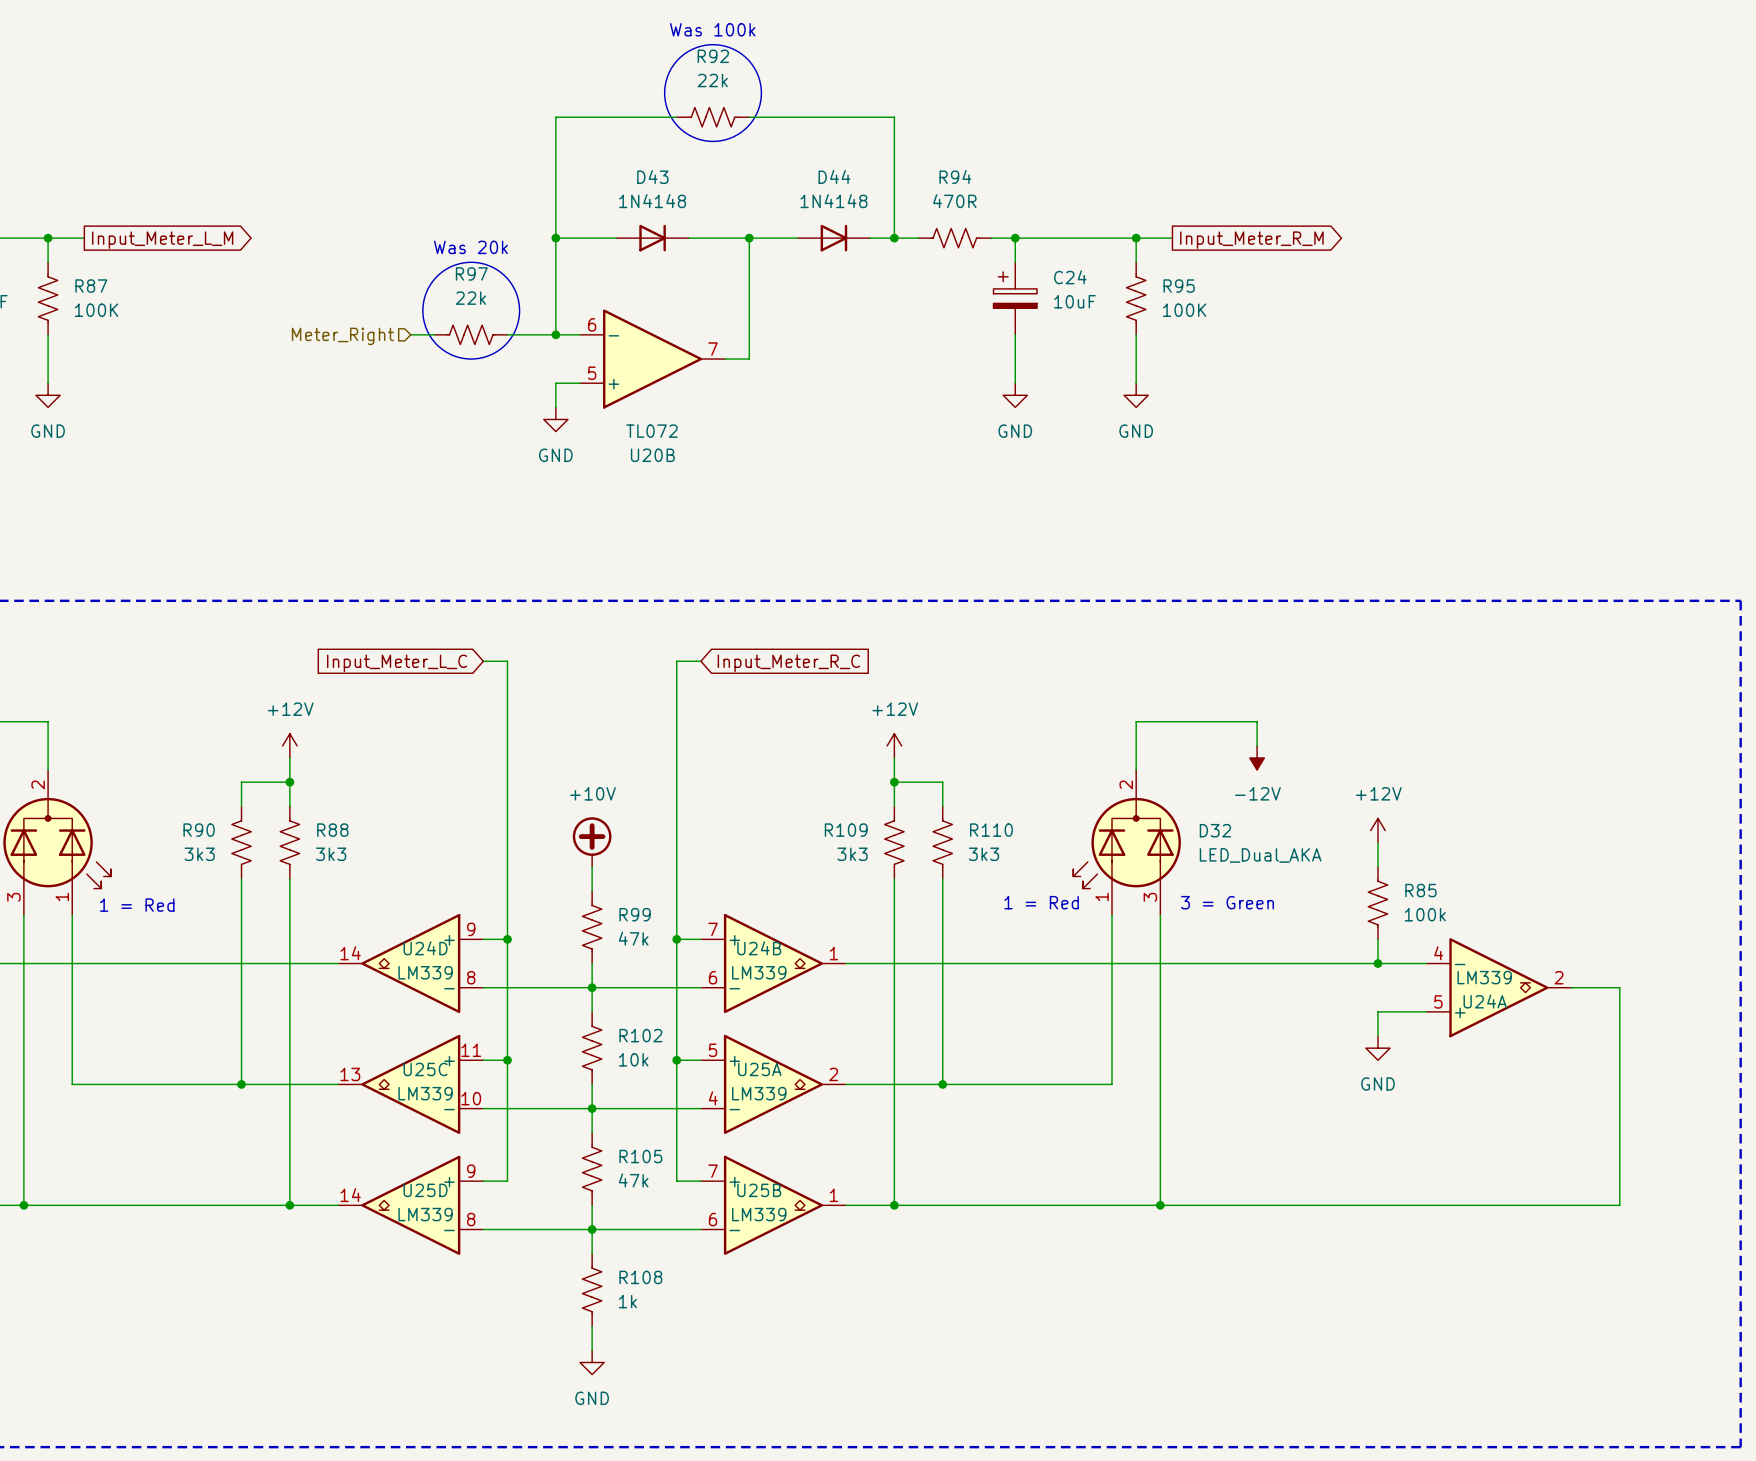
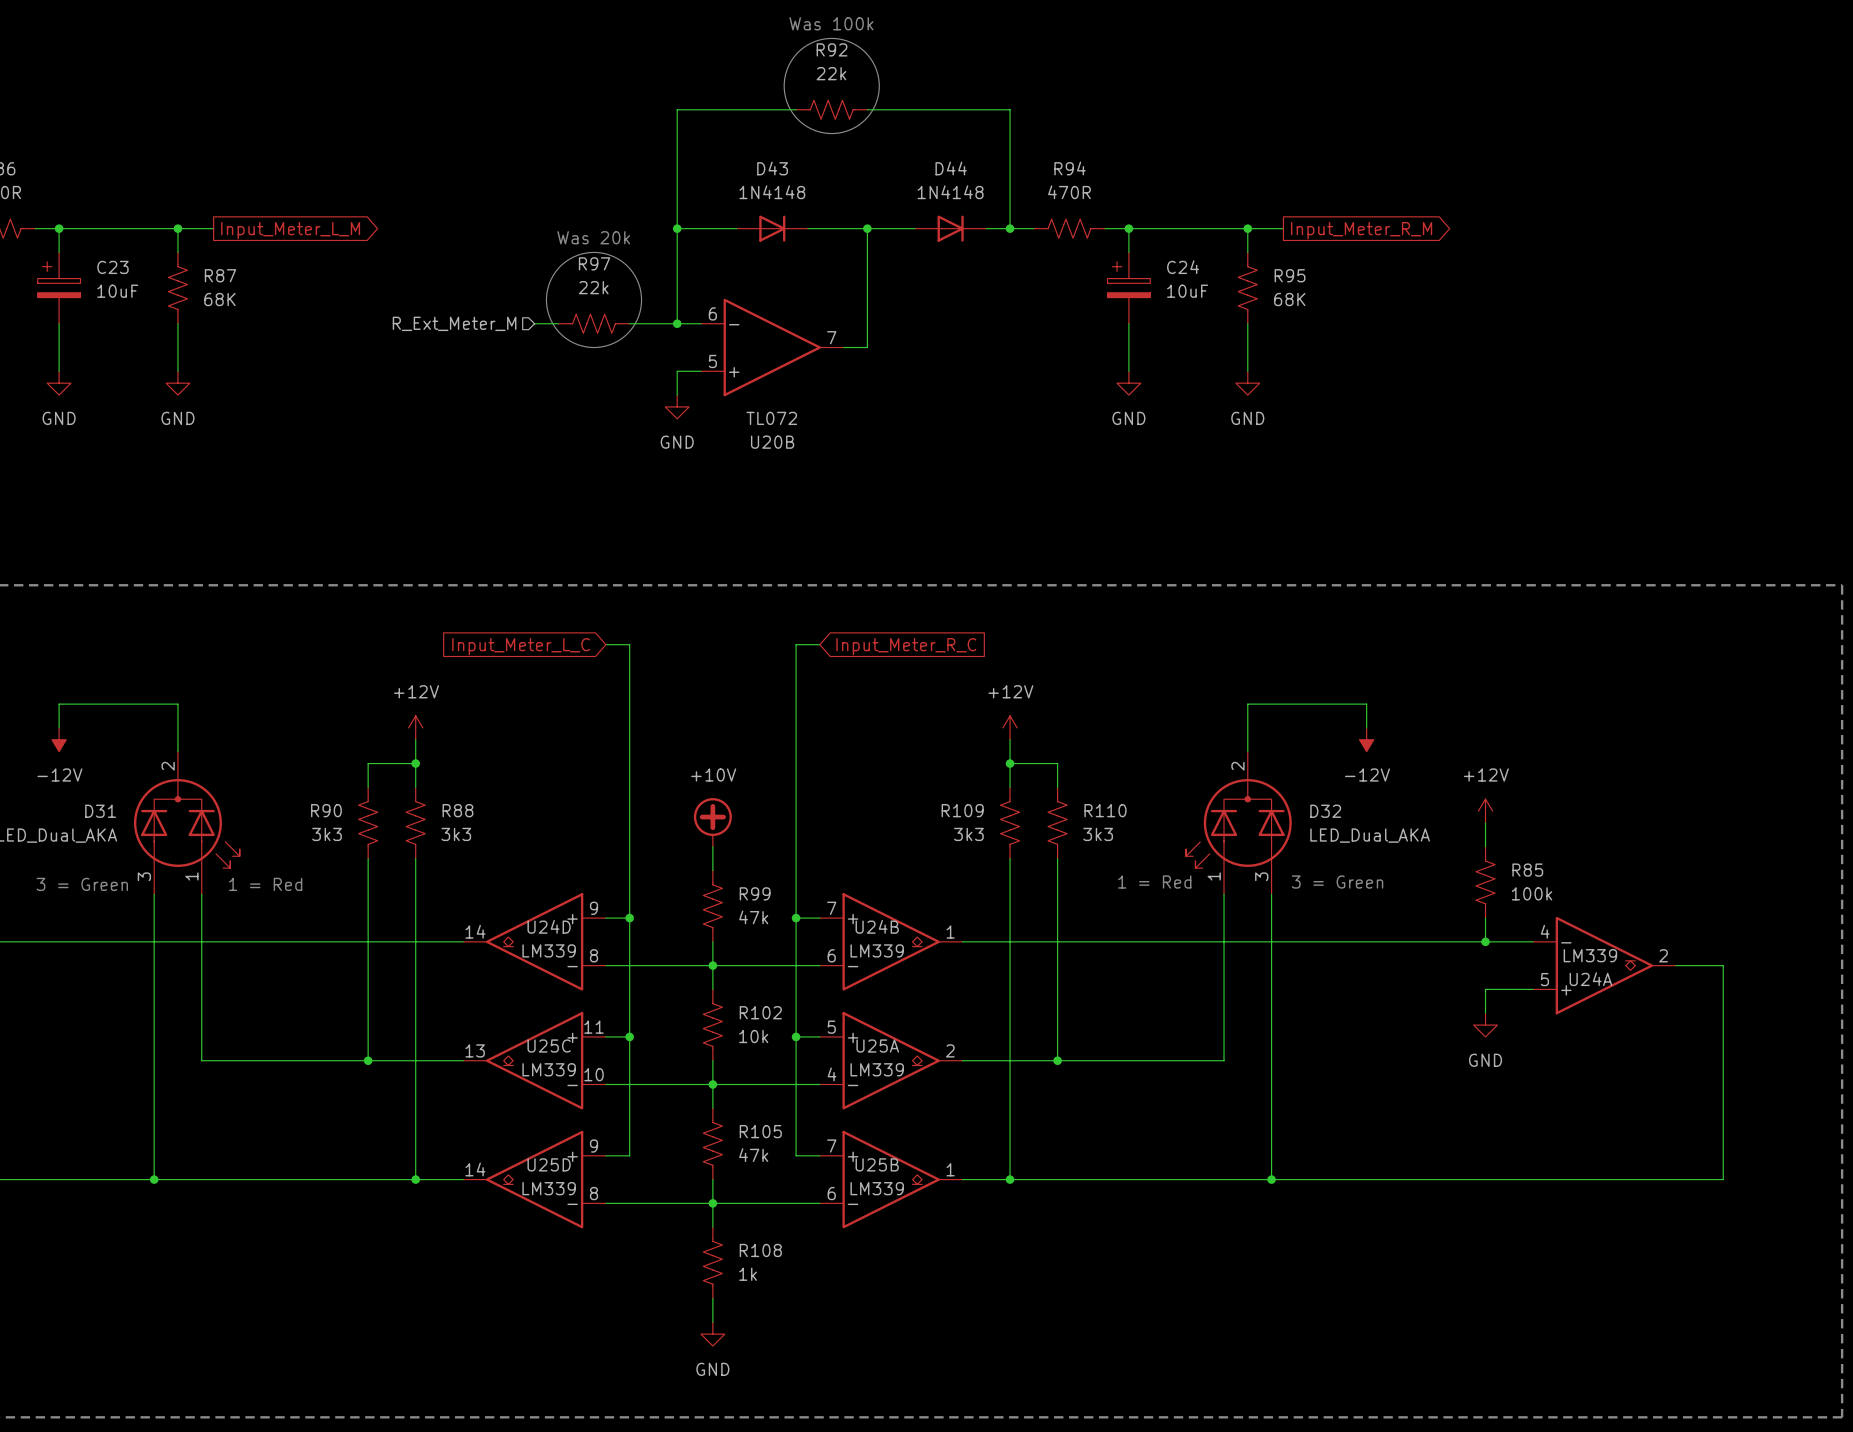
R87 value: 100K (96, 310) -> 68K (219, 299)
R95 value: 100K (1184, 310) -> 68K (1289, 299)
hierarchical label: Meter_Right (342, 336) -> R_Ext_Meter_M (454, 323)

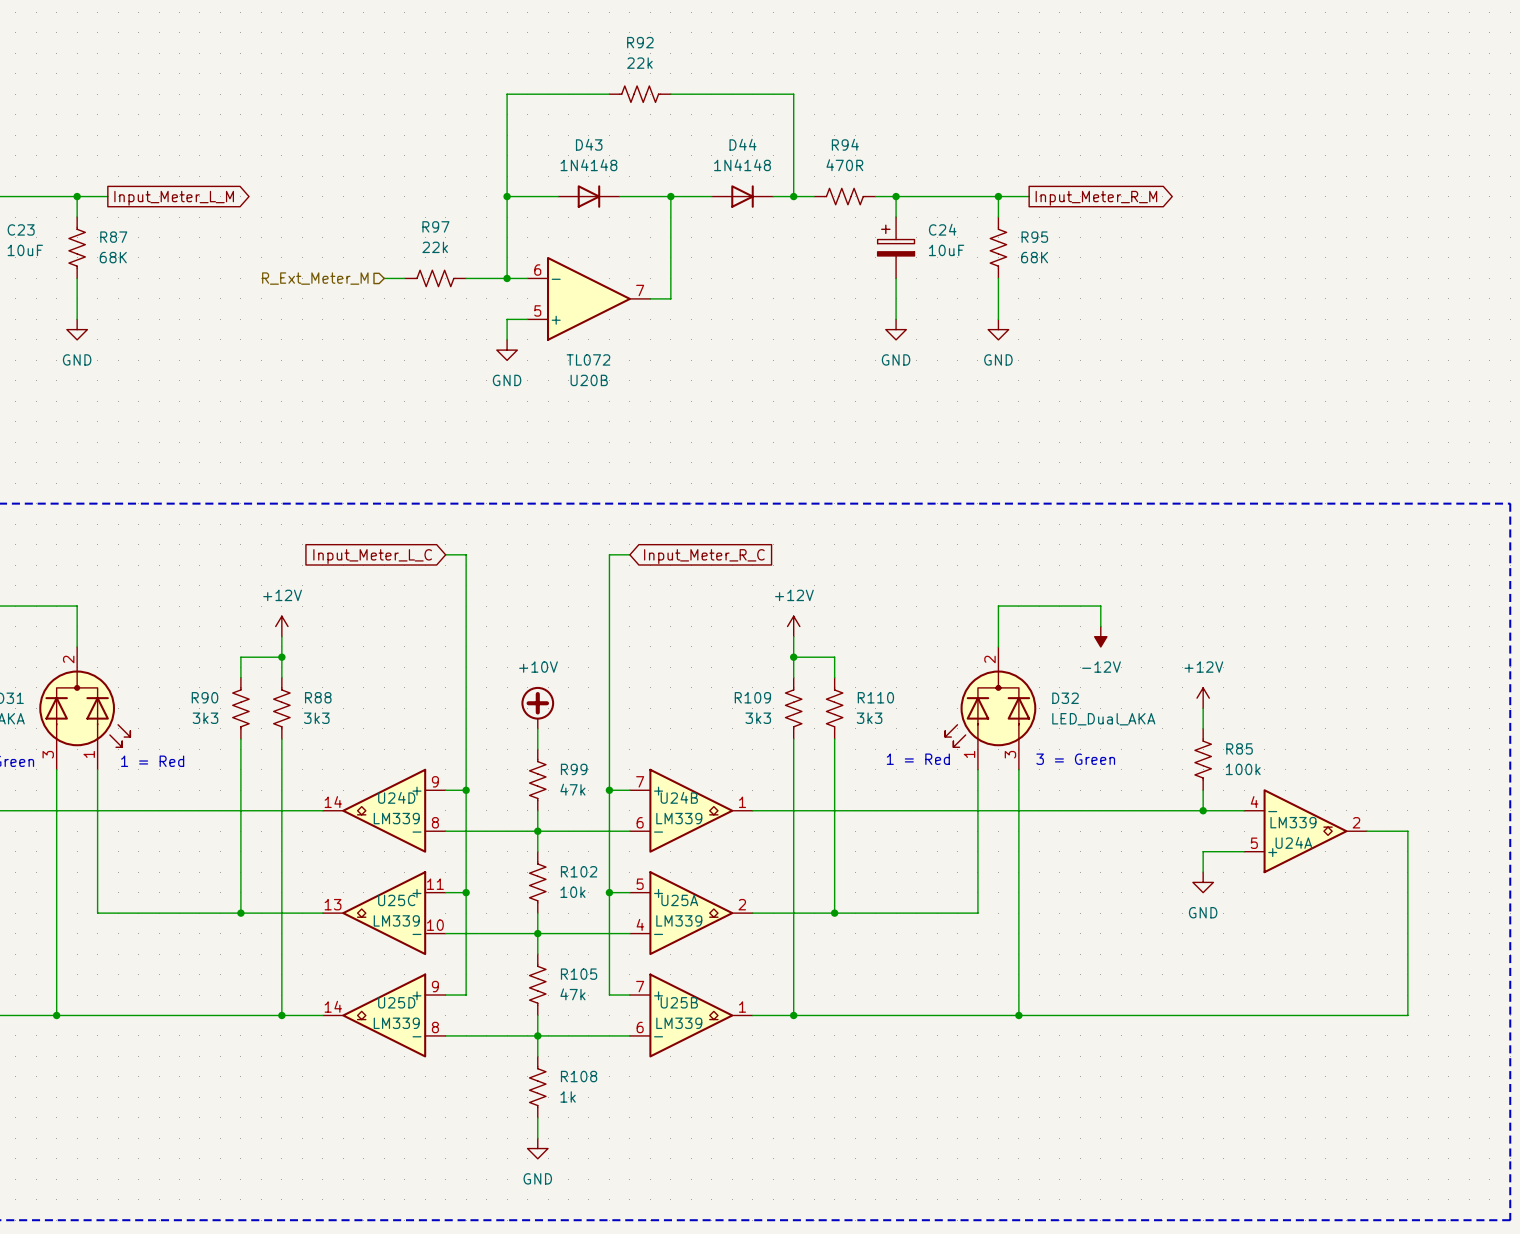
text: Was 100k (831, 23) -> none
drawing: [784, 38, 880, 134] -> none
text: Was 20k (593, 237) -> none
drawing: [546, 252, 642, 348] -> none

